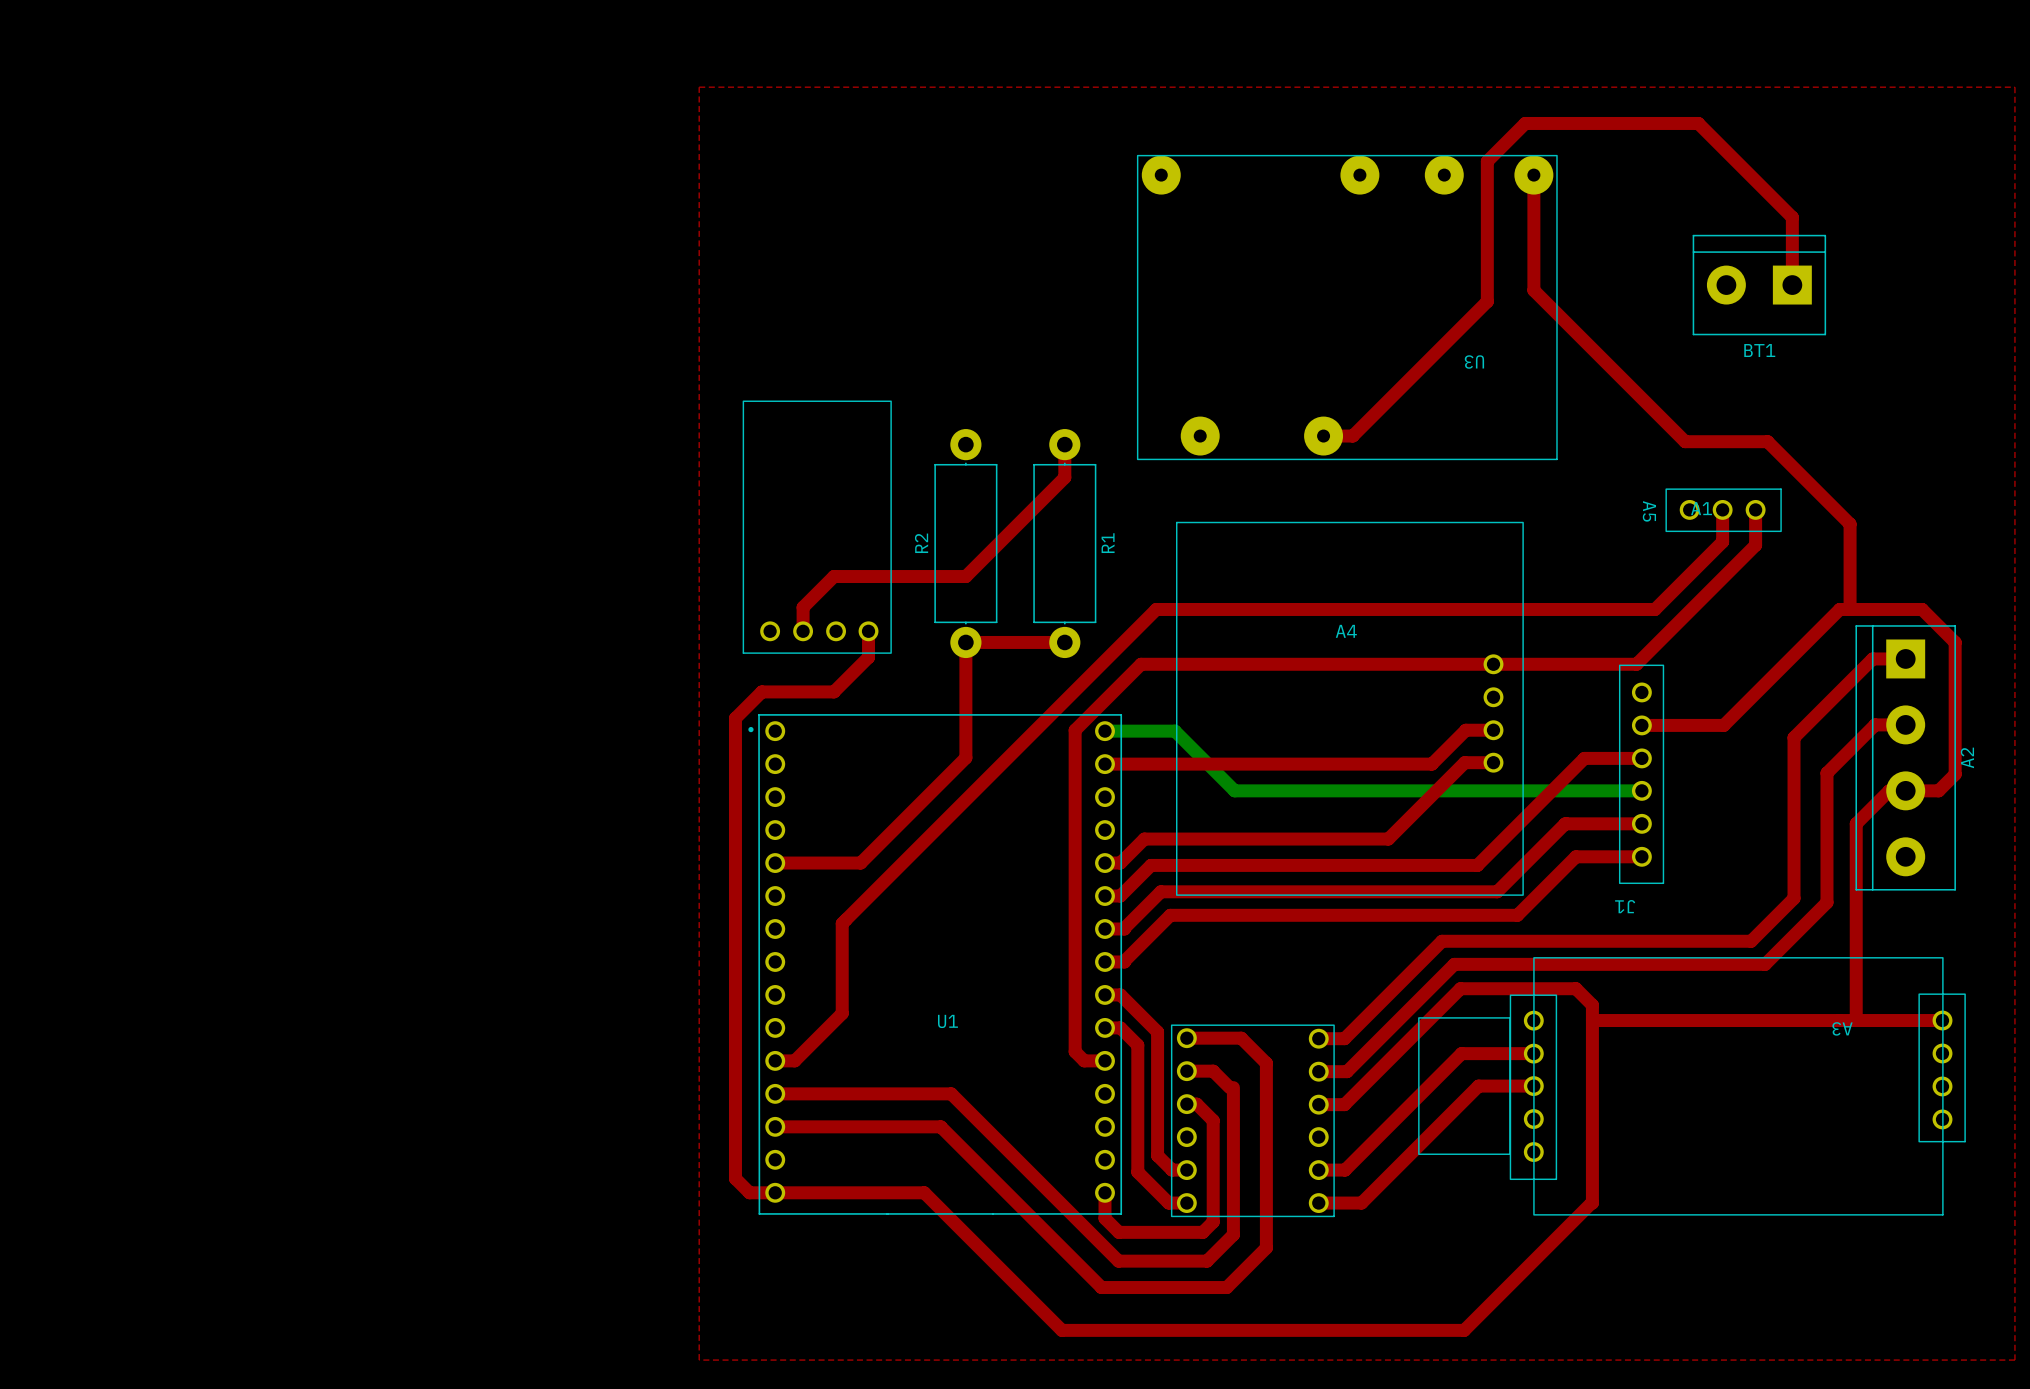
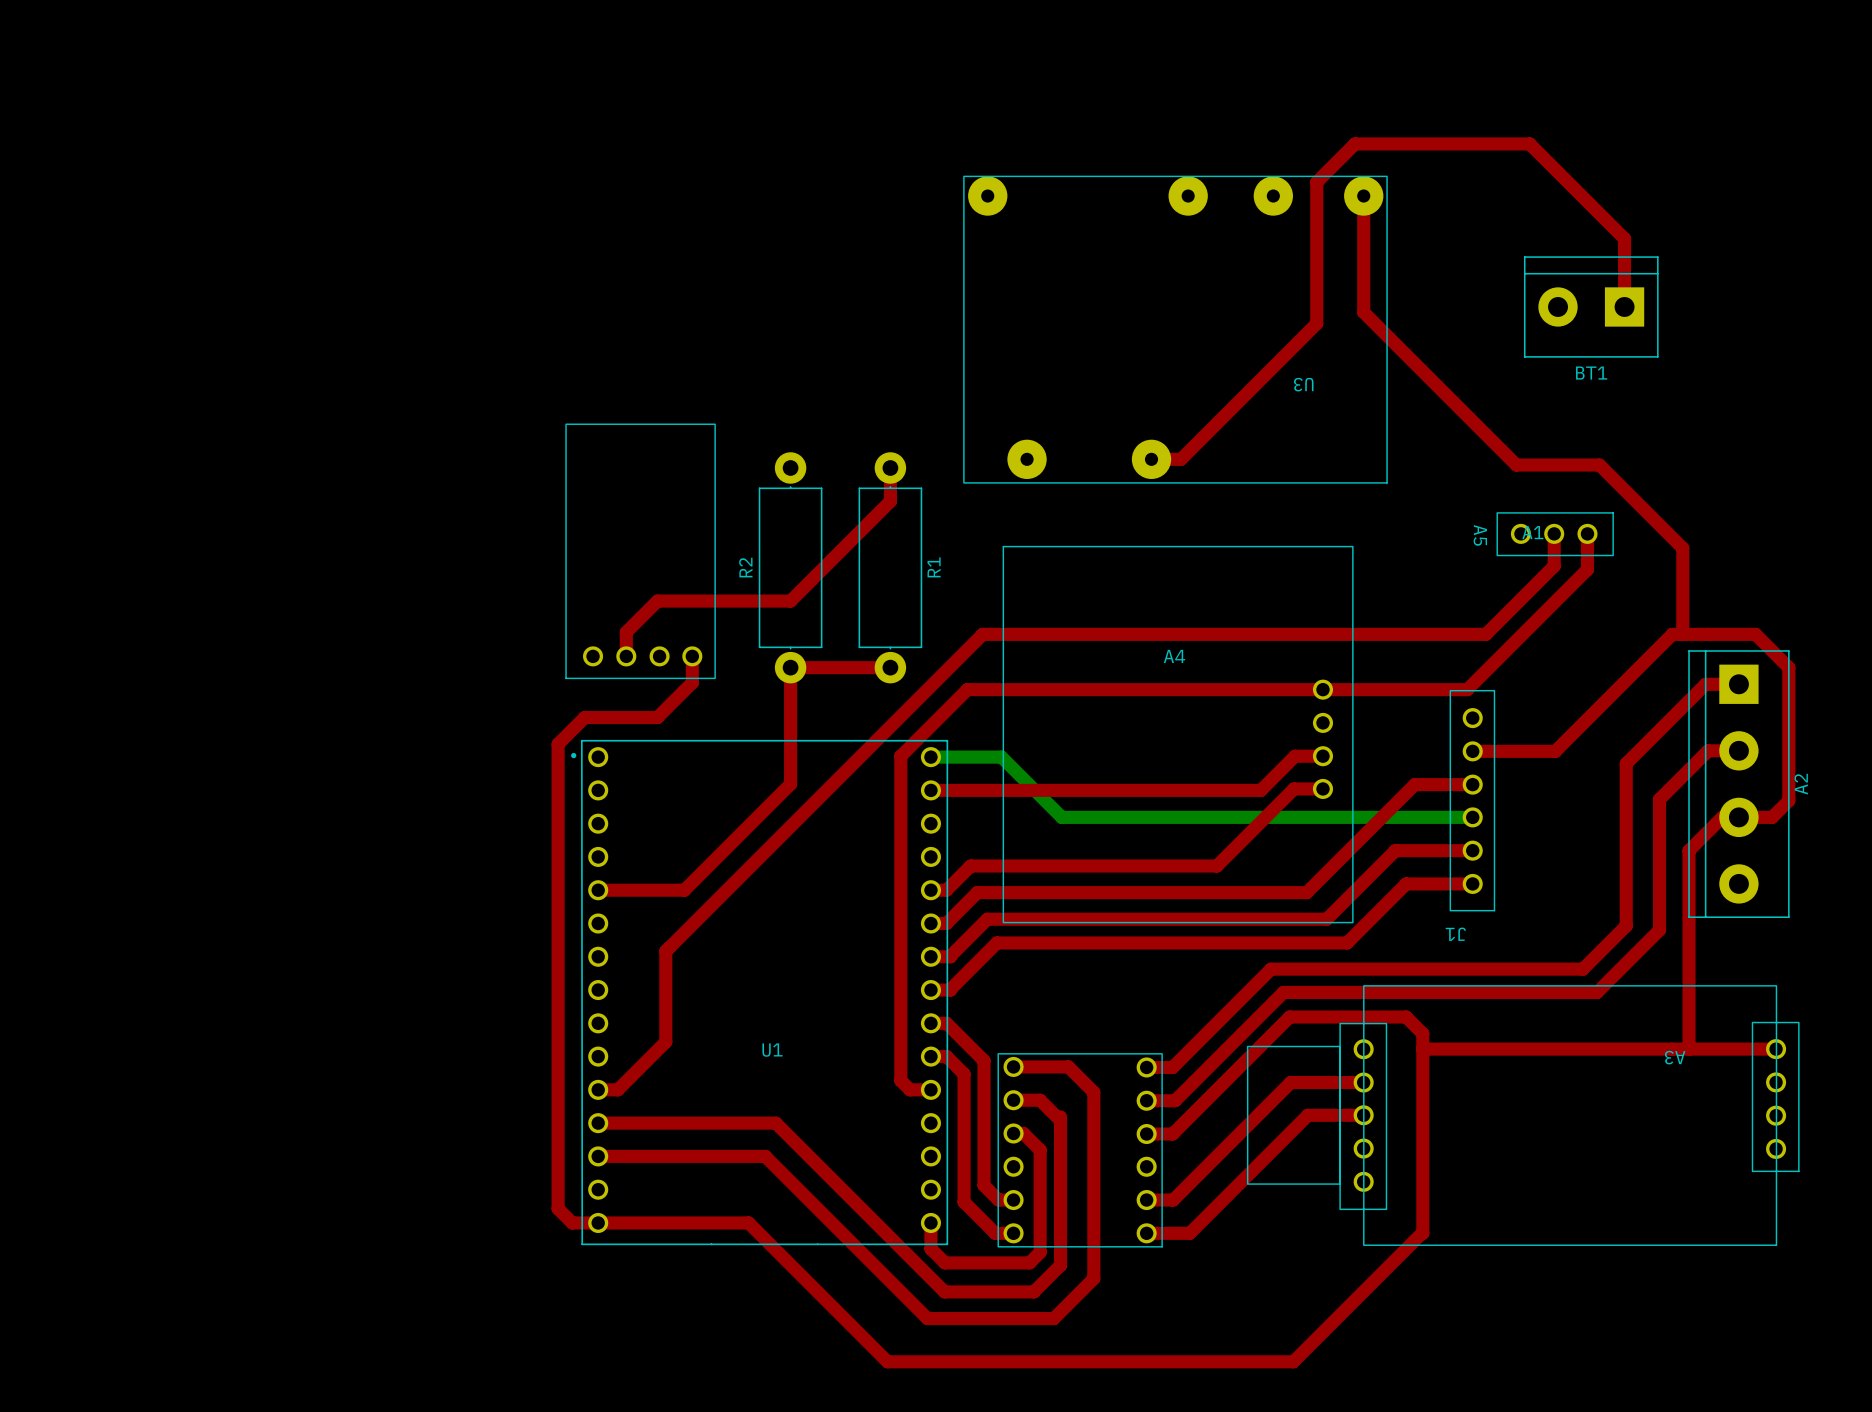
top zone outline: (699, 87) (699, 1360) (2014, 1360) (2014, 87) (699, 87) -> none

